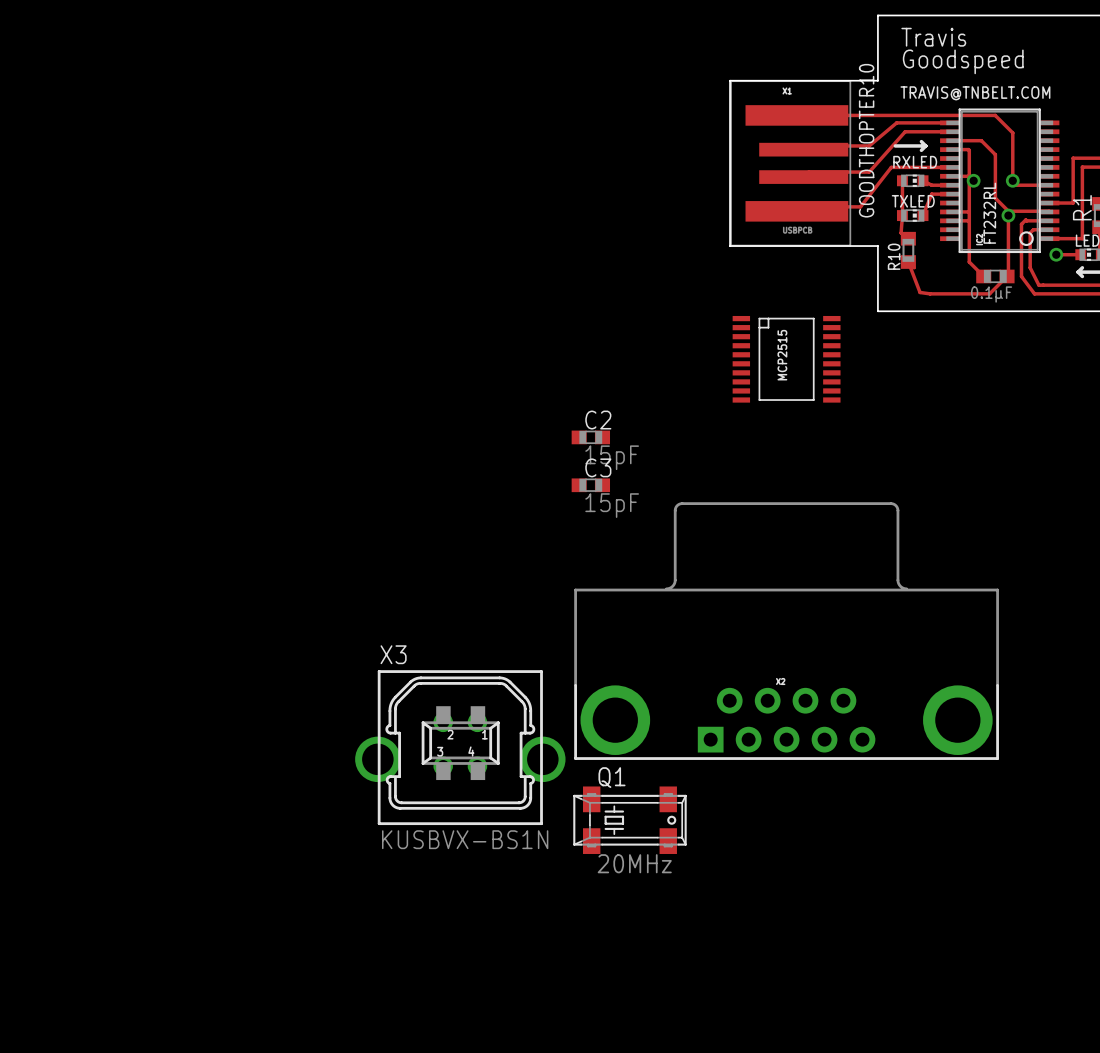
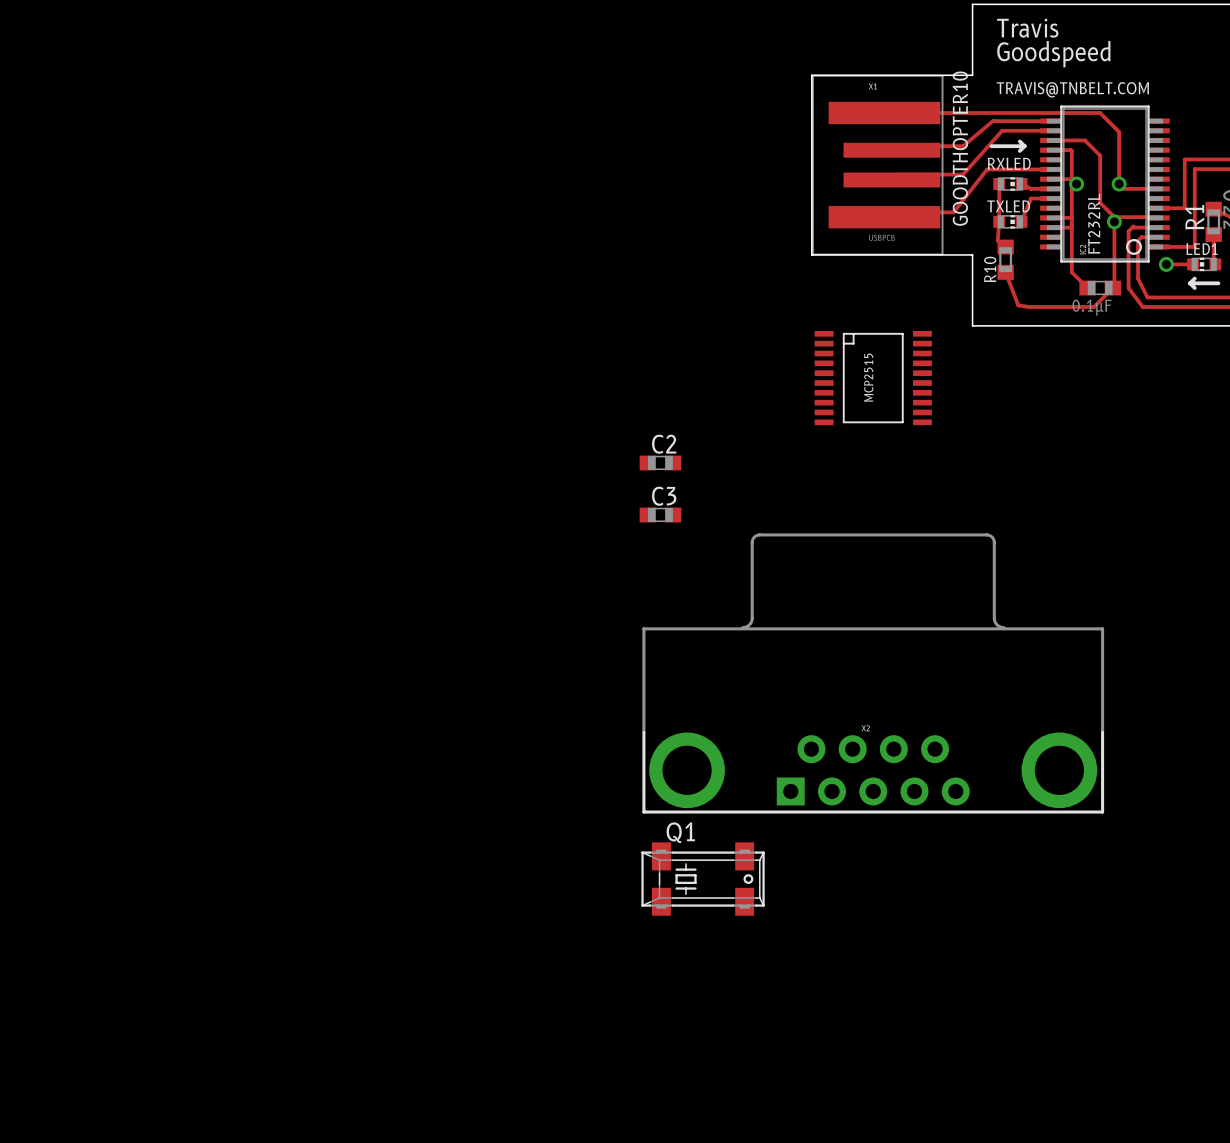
C2 value: 15pF (612, 457) -> none
C3 value: 15pF (612, 505) -> none
X3: KUSBVX-BS1N (460, 747) -> none
Q1 value: 20MHz (634, 863) -> none

